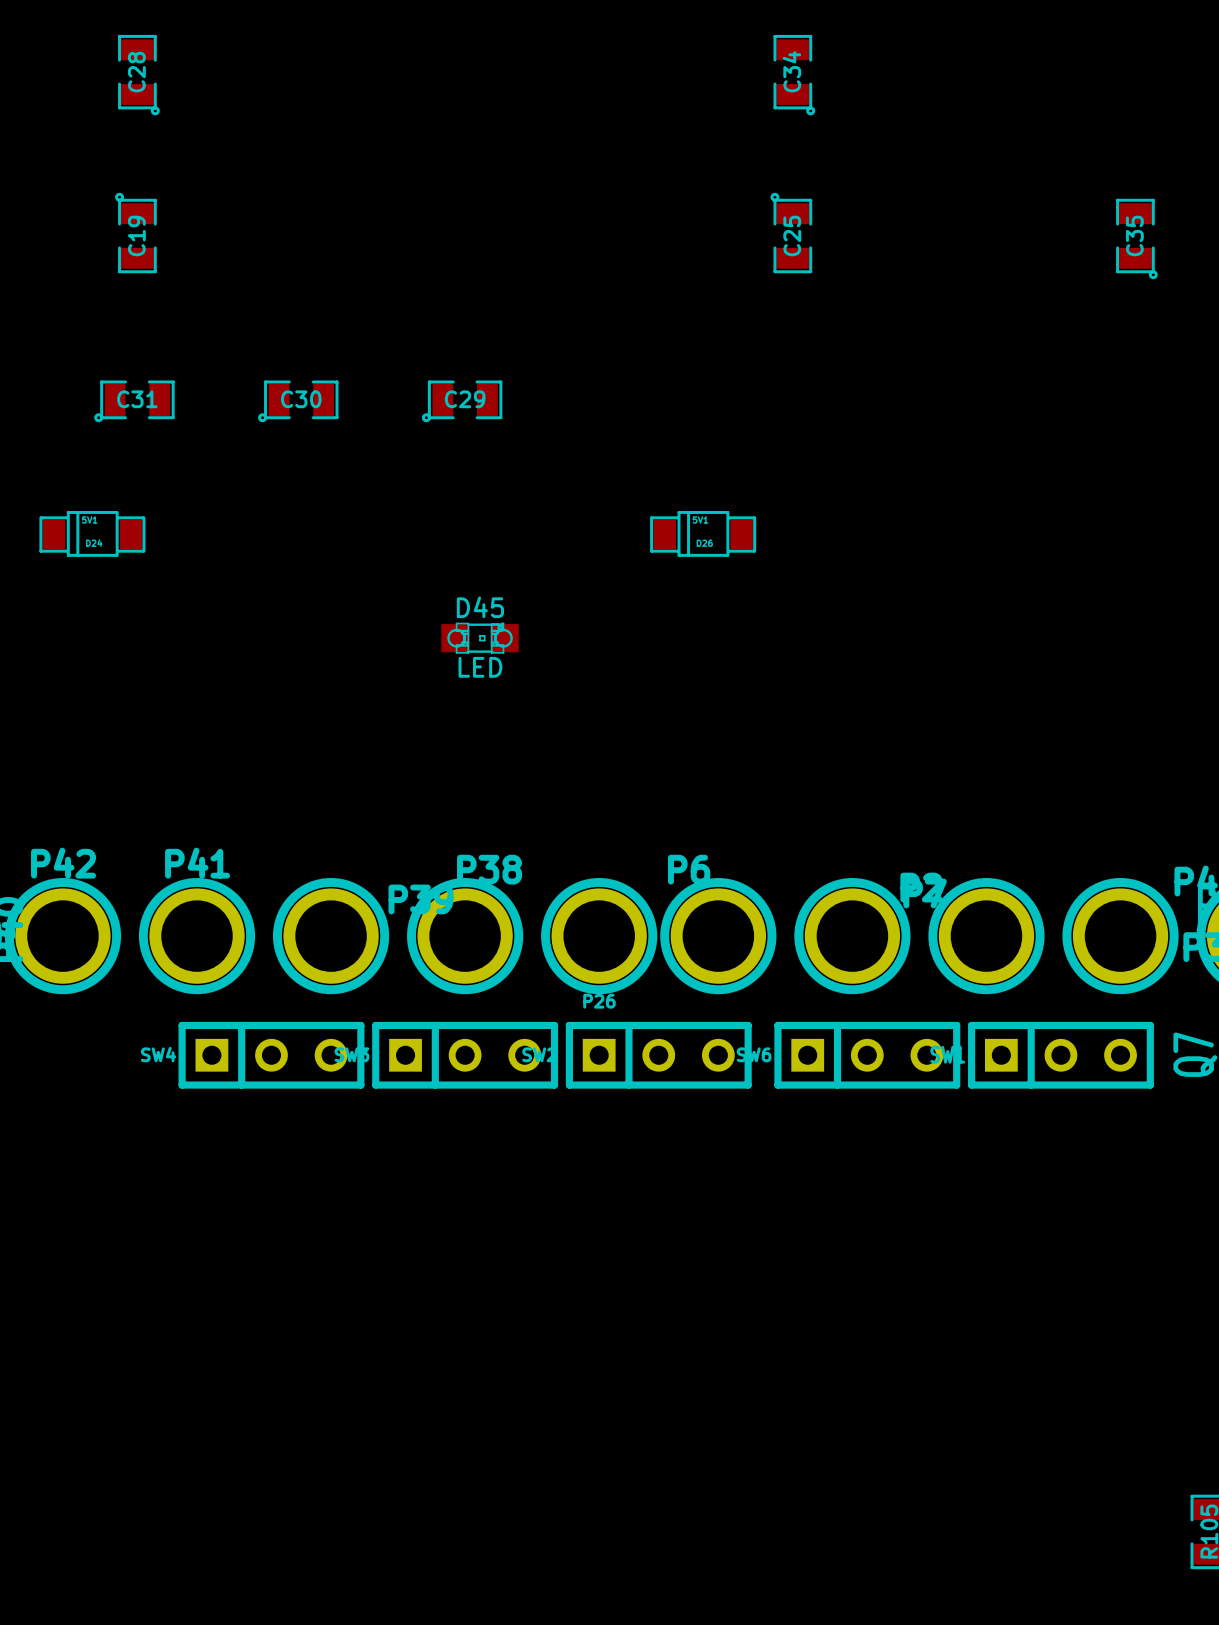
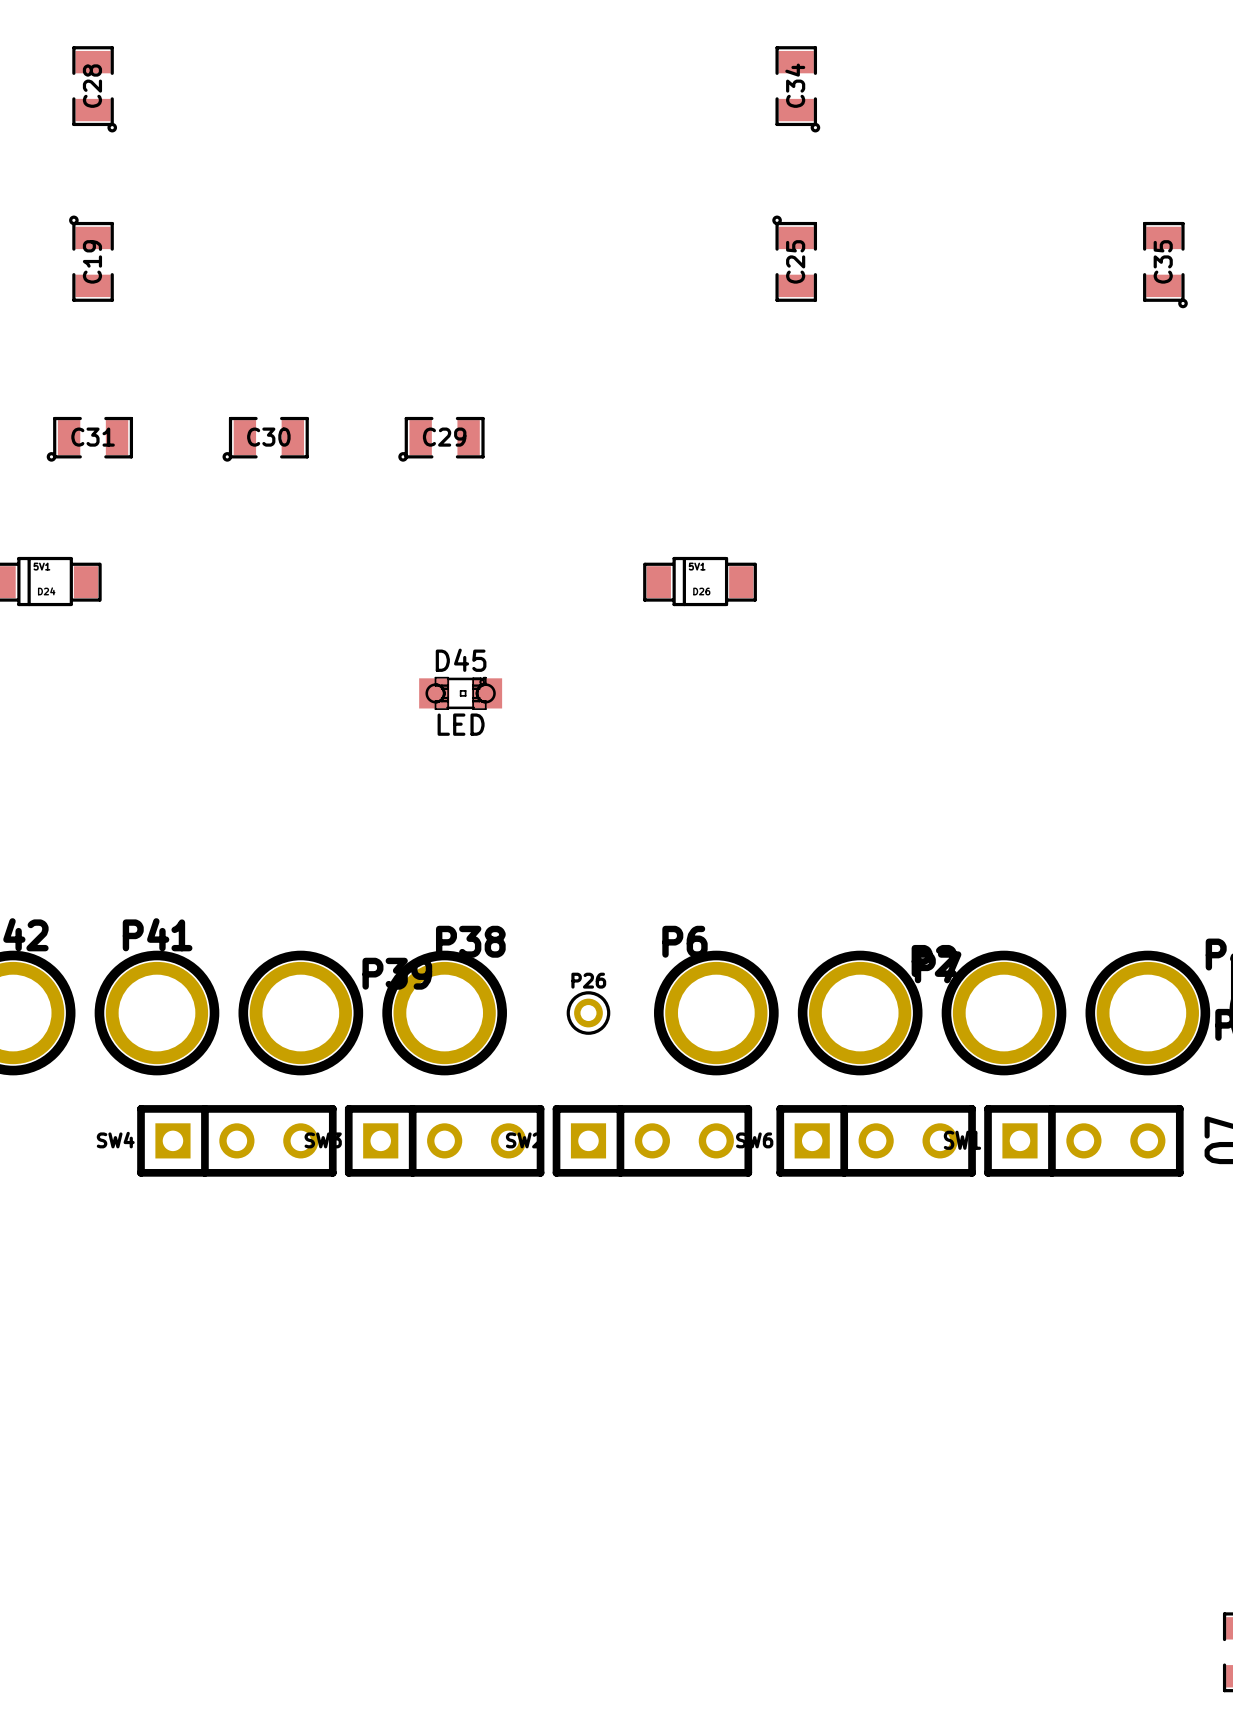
P26 footprint: [541, 878, 658, 995] -> [566, 991, 611, 1035]
P26 name position: P26 (599, 1001) -> P26 (588, 980)

